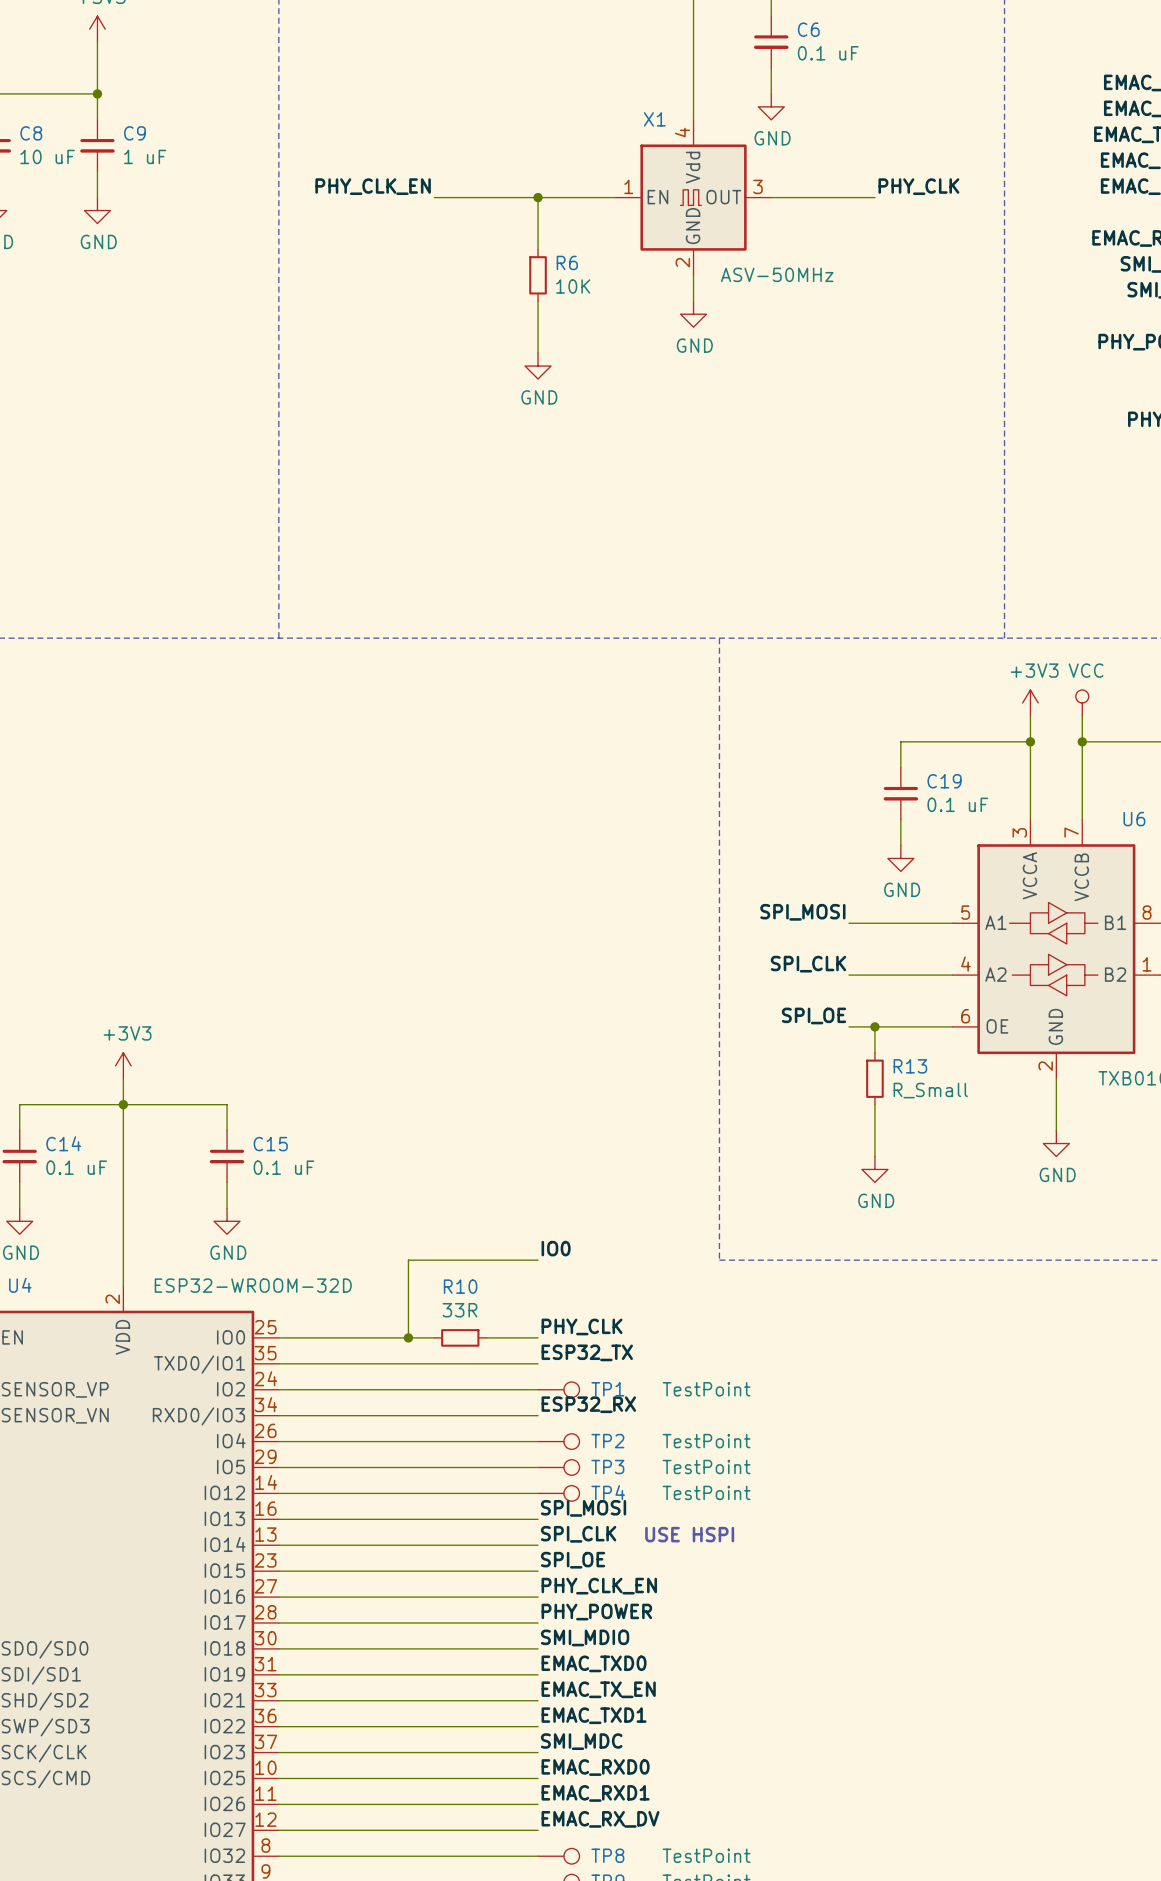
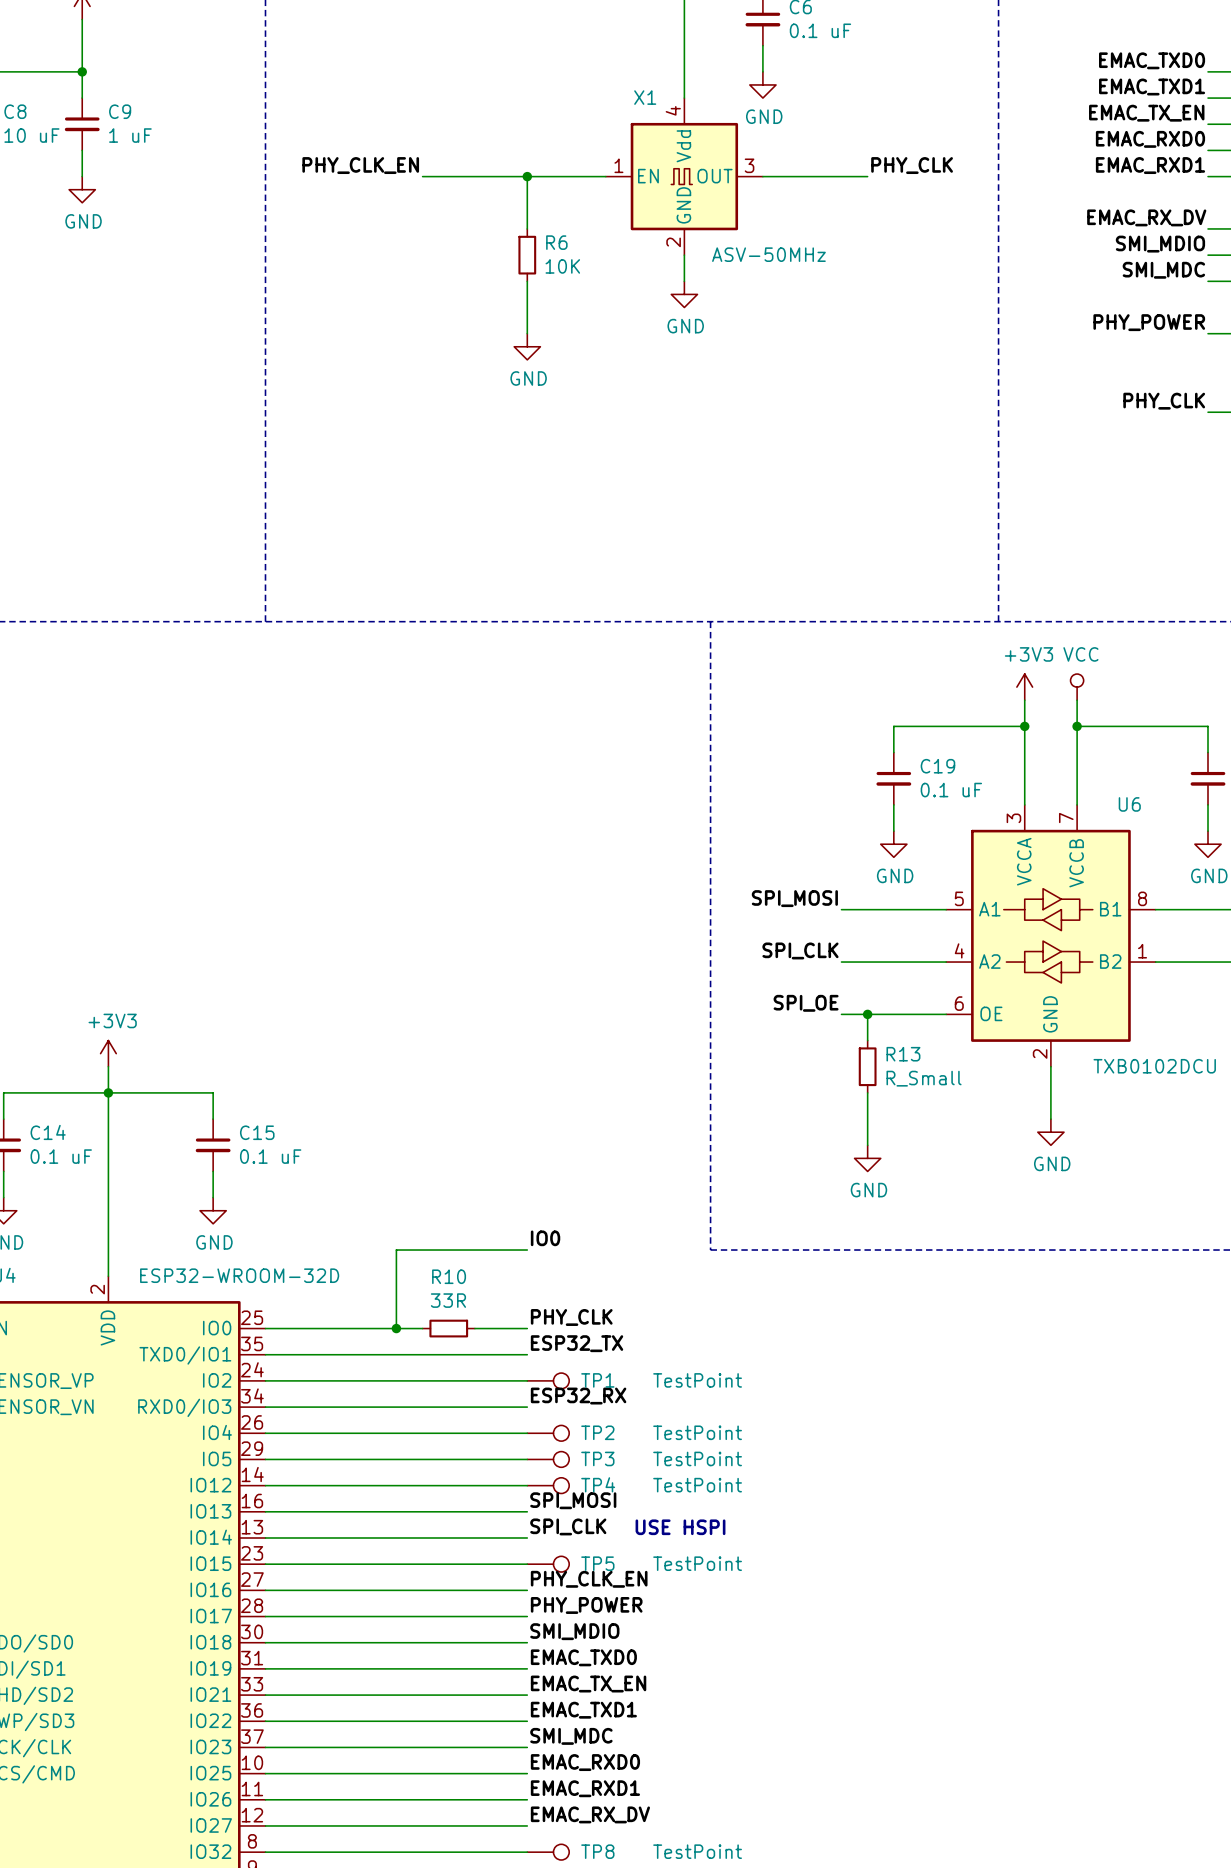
label: SPI_OE (573, 1560) -> none
TP5: none -> TestPoint (548, 1564)

